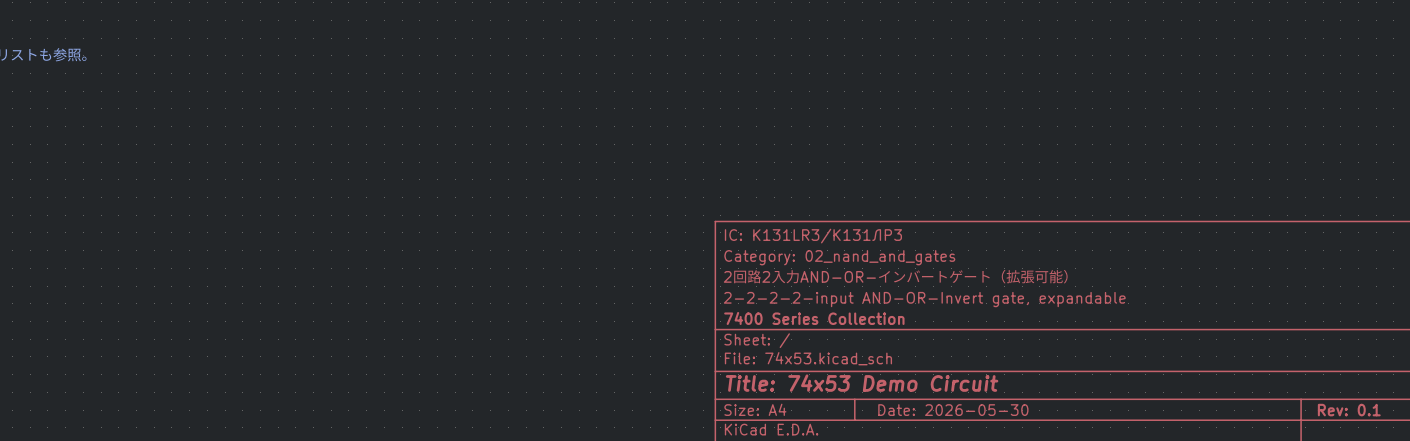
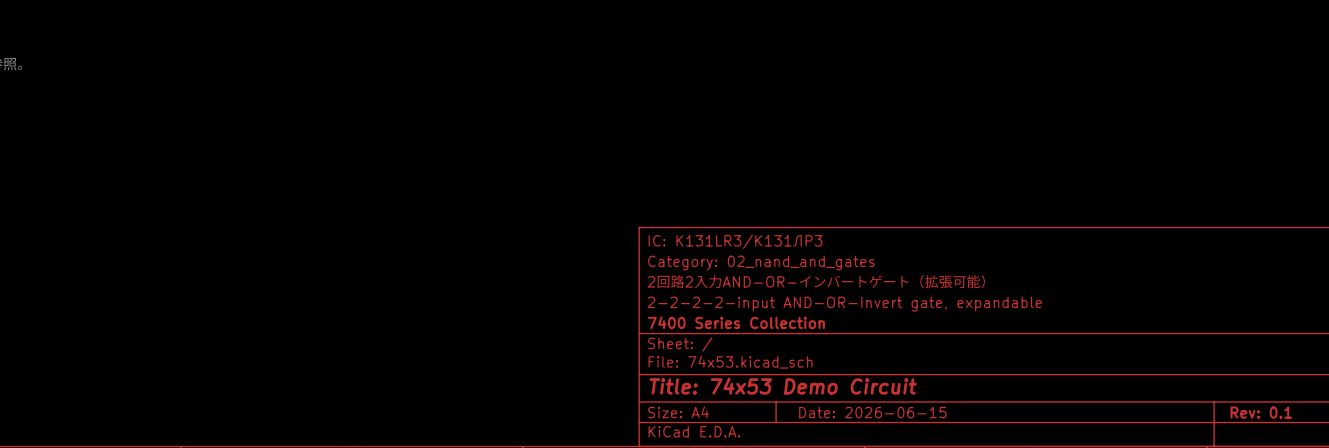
title block: Date: 2026-05-30 (953, 410) -> Date: 2026-06-15 (872, 412)

